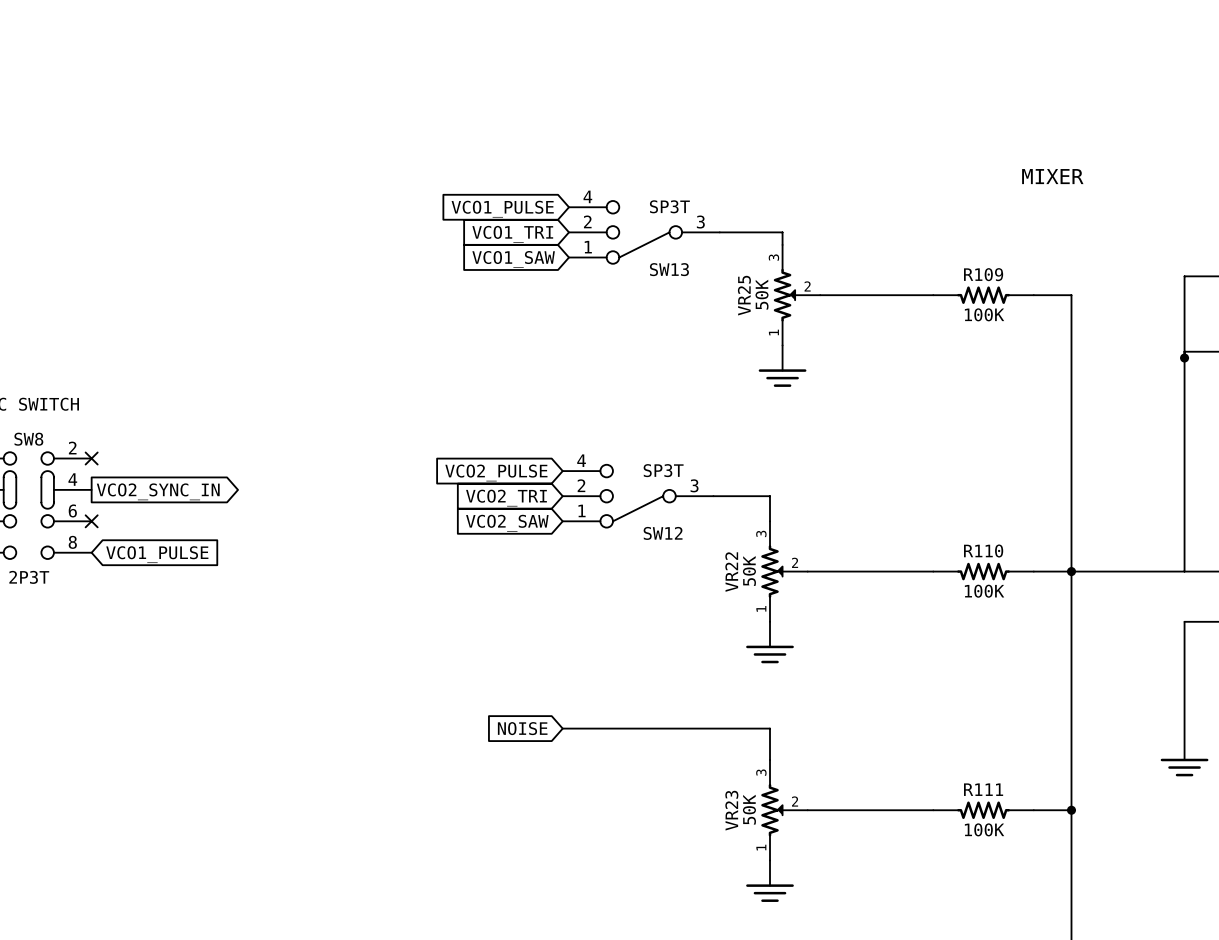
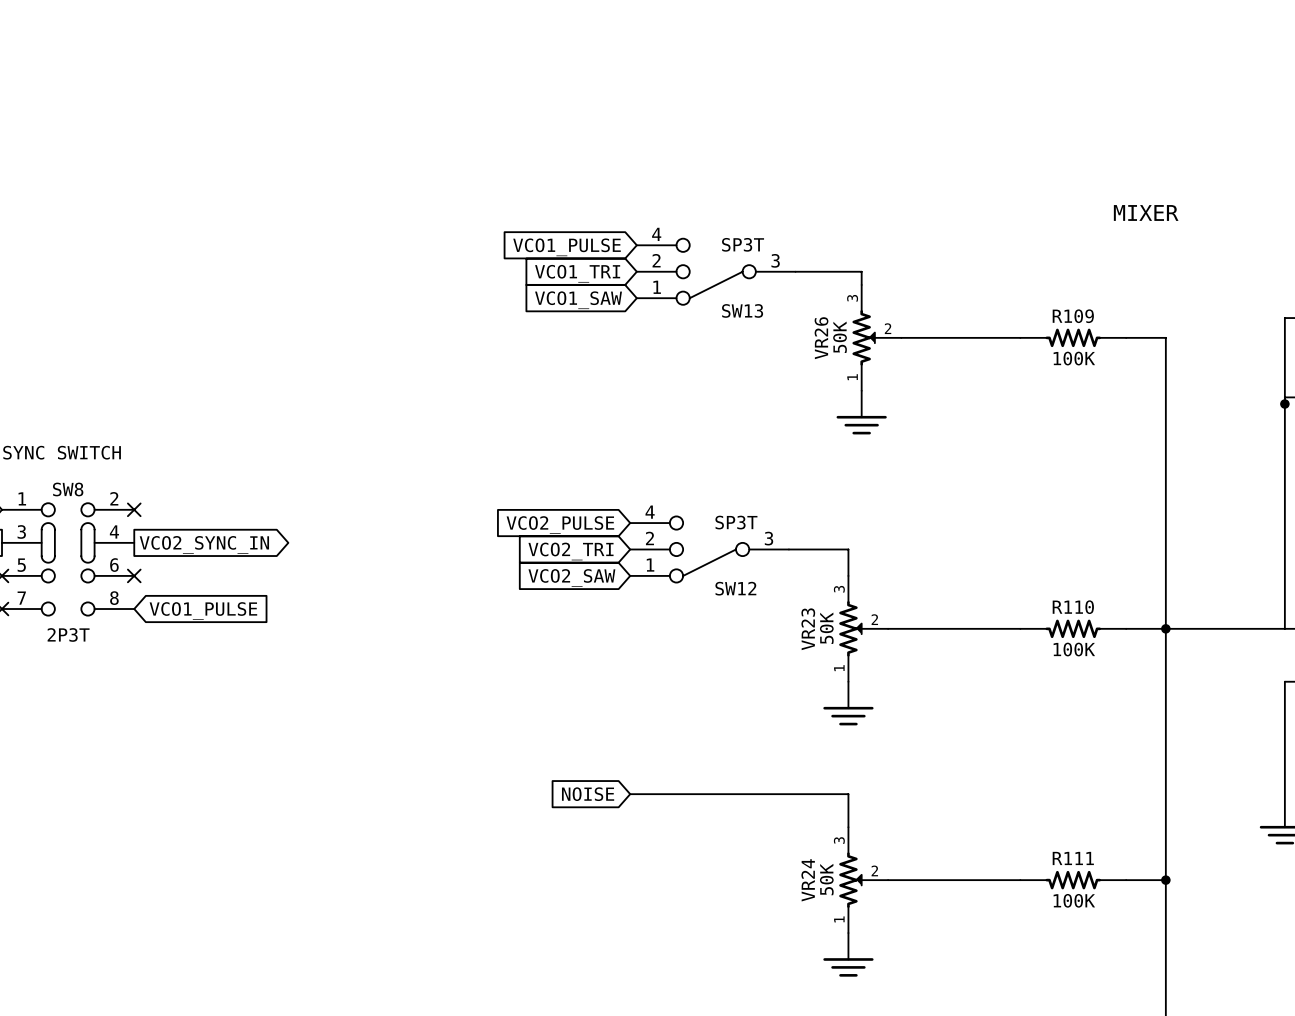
VR25 name: VR25 (744, 295) -> VR26 (821, 338)
VR22 name: VR22 (731, 572) -> VR23 (808, 629)
VR23 name: VR23 (731, 810) -> VR24 (808, 880)

